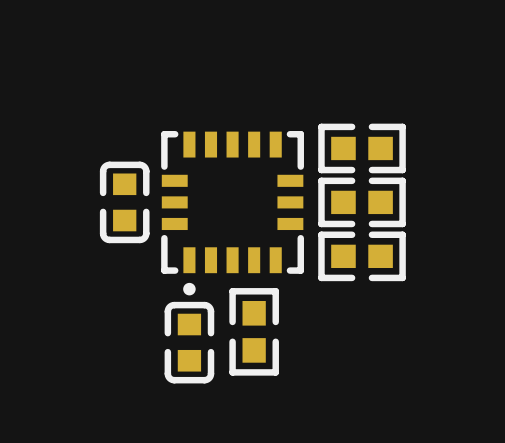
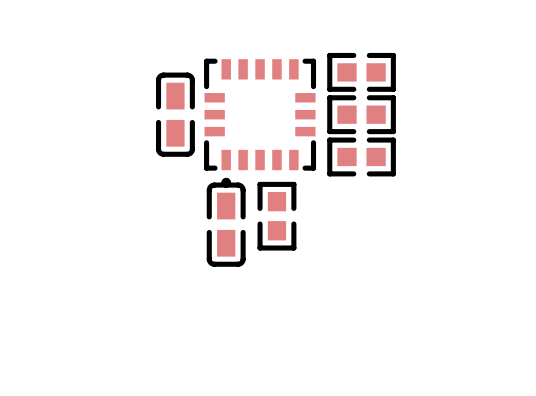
part footprint: [99, 161, 150, 244] -> [155, 72, 195, 157]
part footprint: [164, 301, 215, 384] -> [206, 182, 246, 267]

